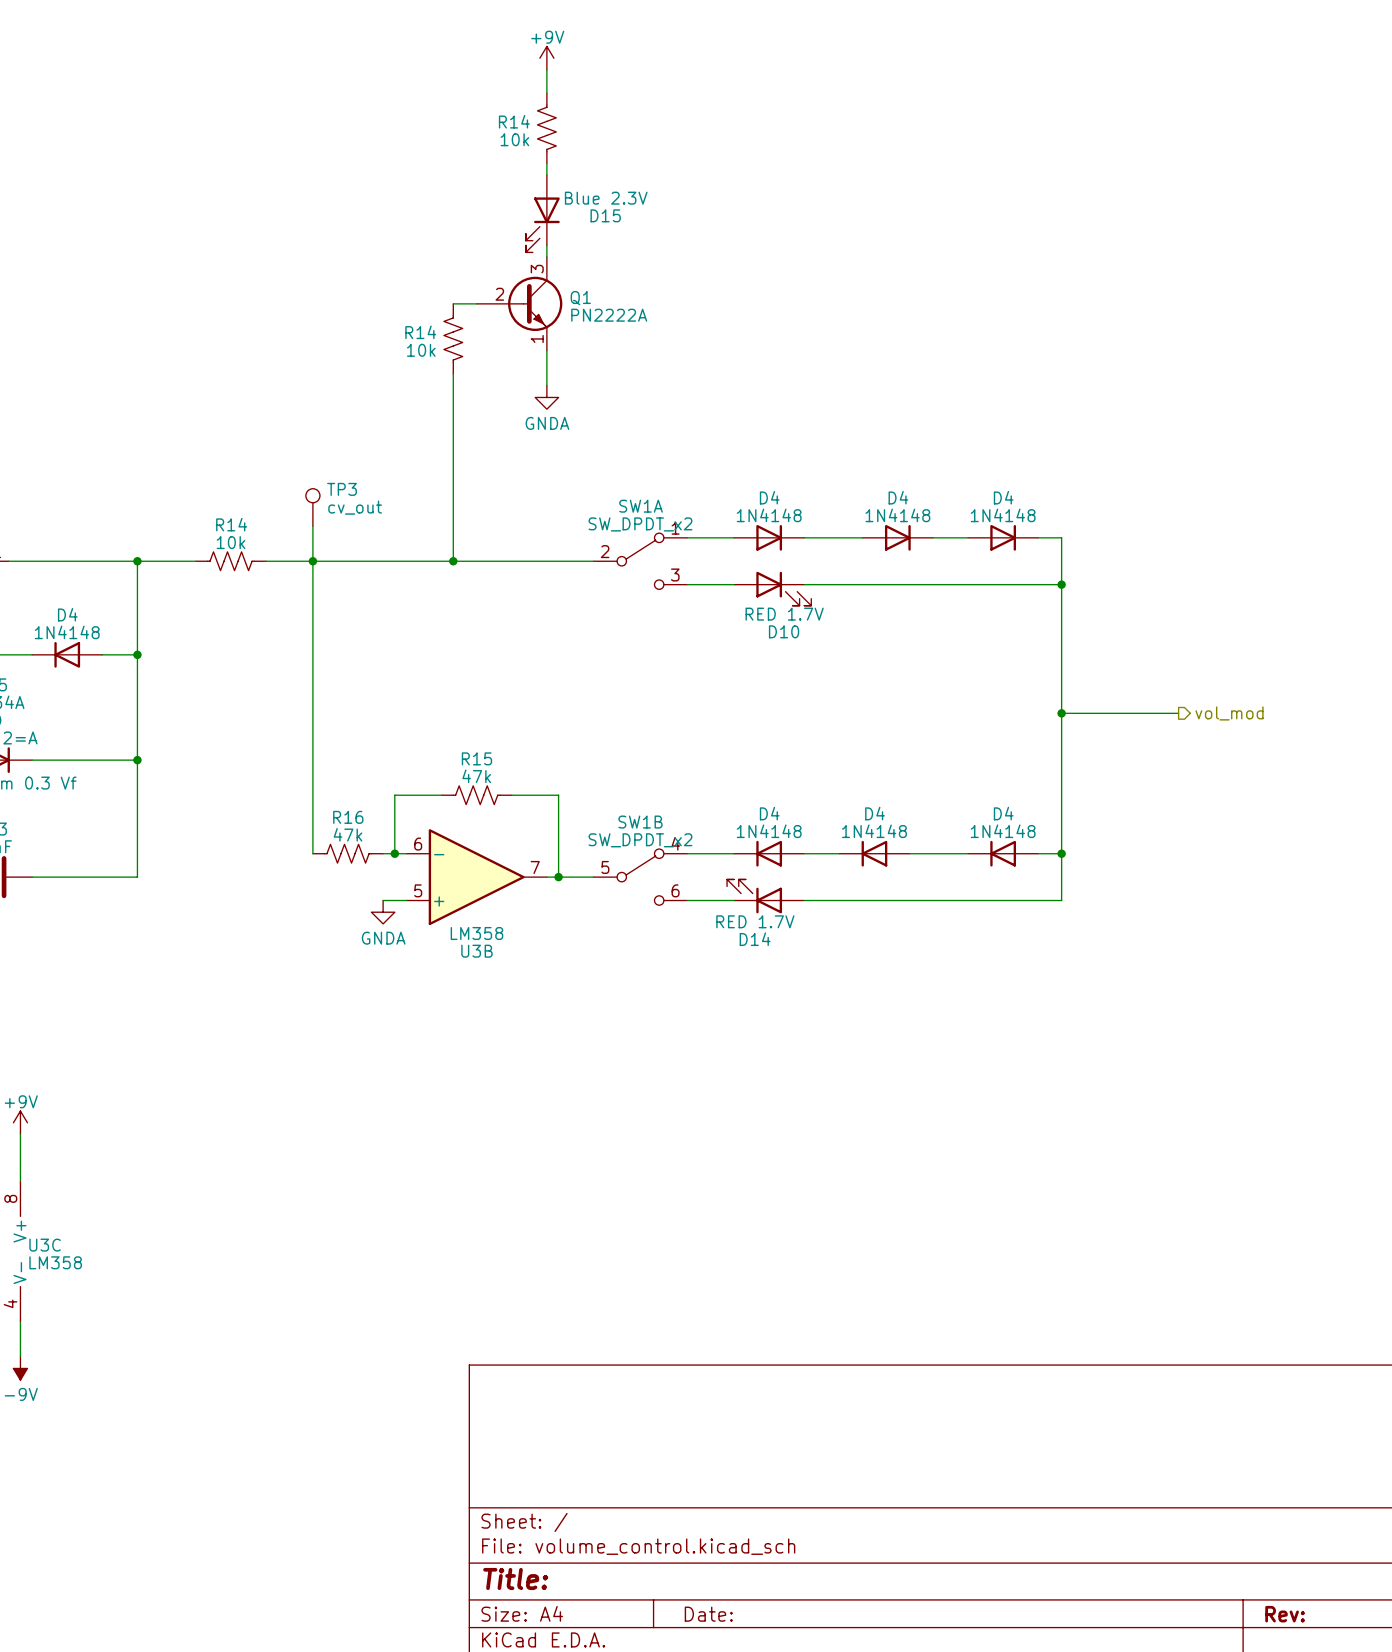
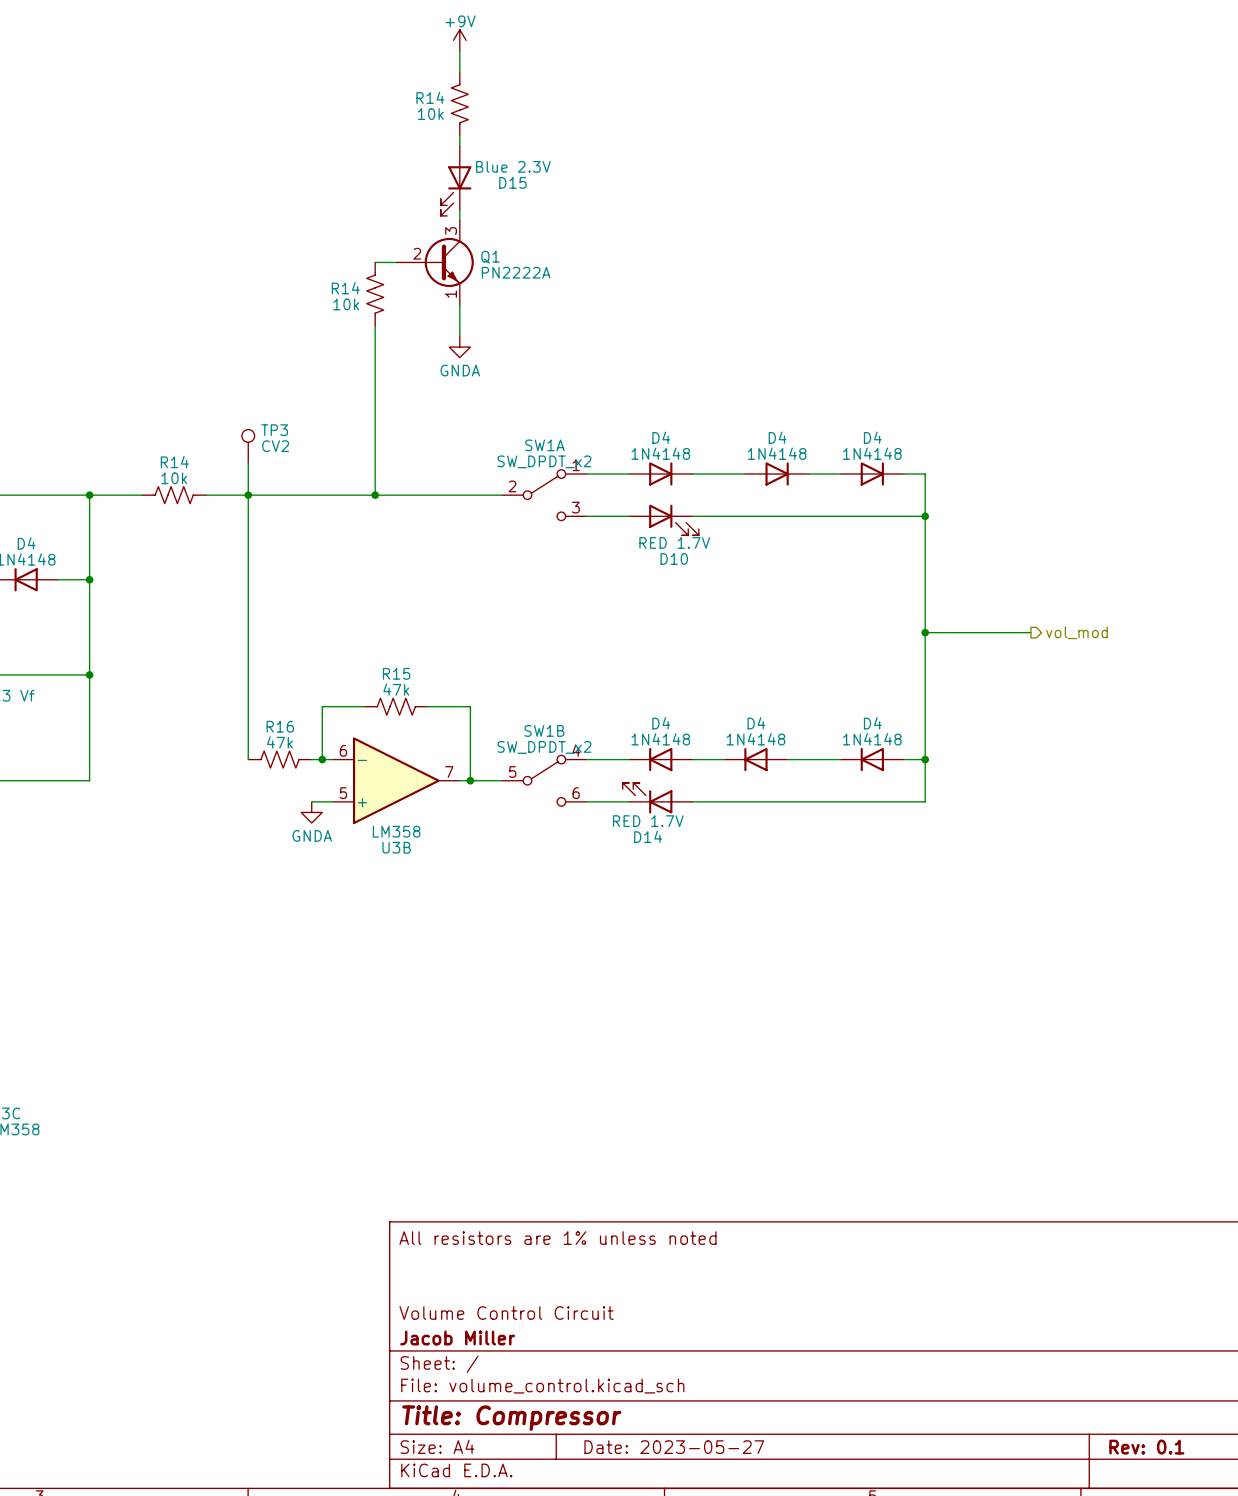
TP3 value: cv_out (355, 507) -> CV2 (275, 446)
title block: none -> All resistors are 1% unless noted (557, 1238)
title block: none -> Volume Control Circuit (506, 1313)
title block: none -> Jacob Miller (457, 1338)
title block: Title: (515, 1578) -> Title: Compressor (511, 1418)
title block: Date: (708, 1614) -> Date: 2023-05-27 (674, 1447)
title block: Rev: (1285, 1614) -> Rev: 0.1 (1146, 1447)

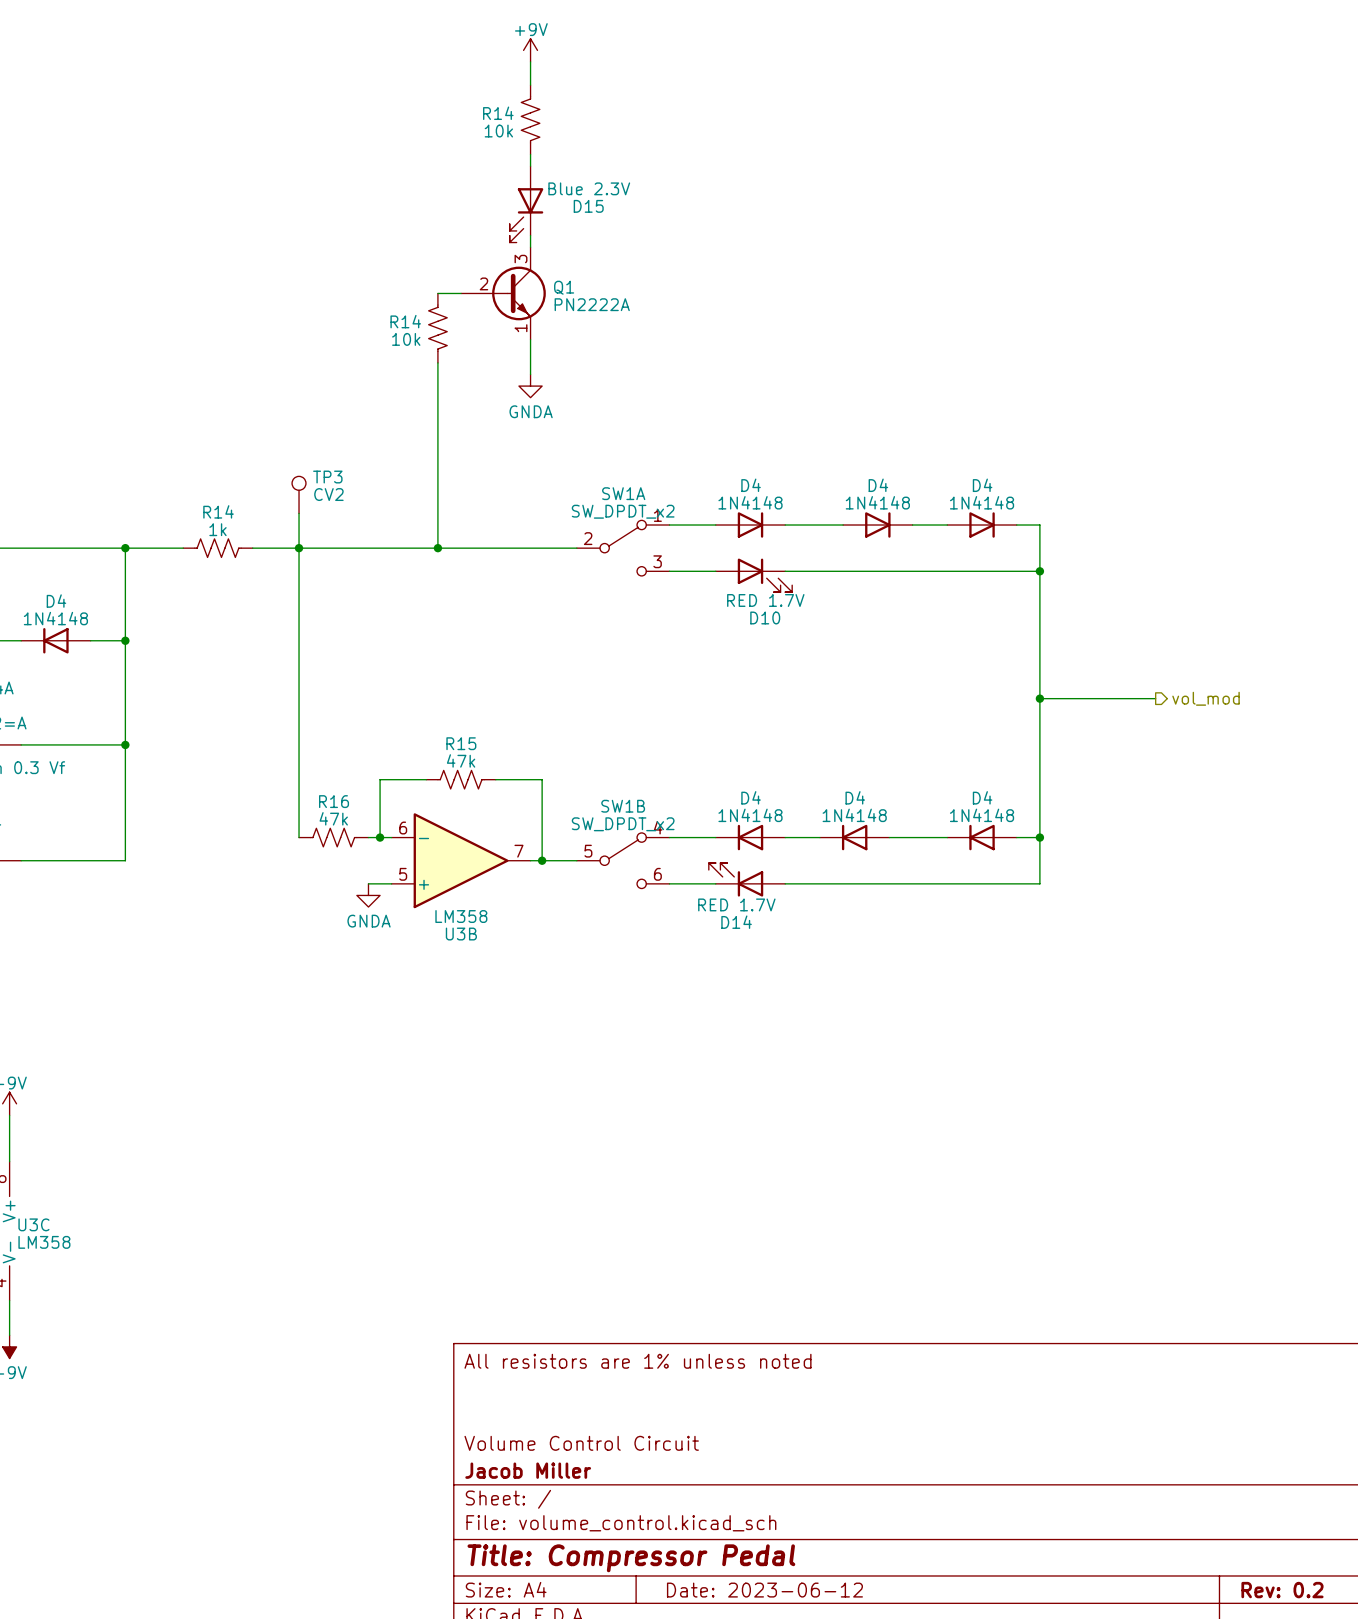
R14 value: 10k (174, 478) -> 1k (217, 529)
title block: Title: Compressor (511, 1418) -> Title: Compressor Pedal (631, 1558)
title block: Date: 2023-05-27 (674, 1447) -> Date: 2023-06-12 (764, 1590)
title block: Rev: 0.1 (1146, 1447) -> Rev: 0.2 (1282, 1590)

